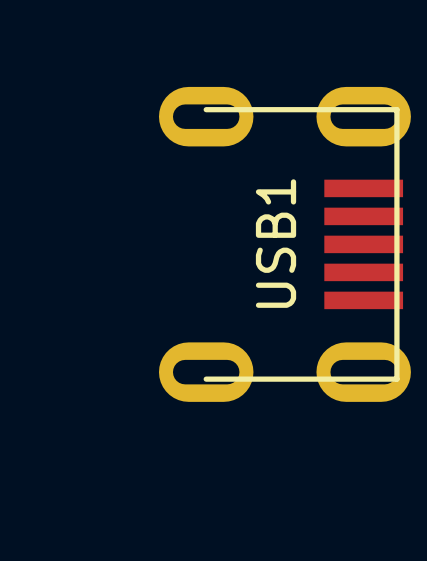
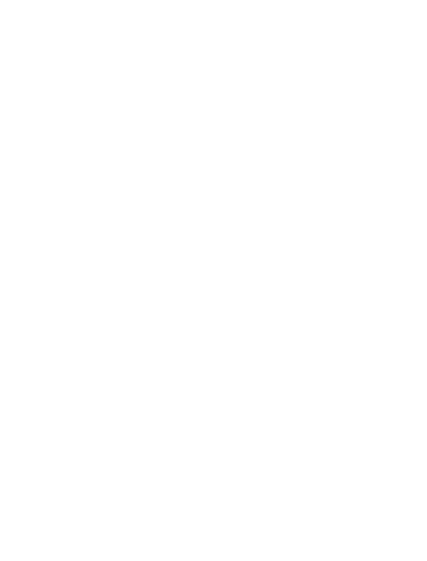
USB1: (284, 244) -> none

